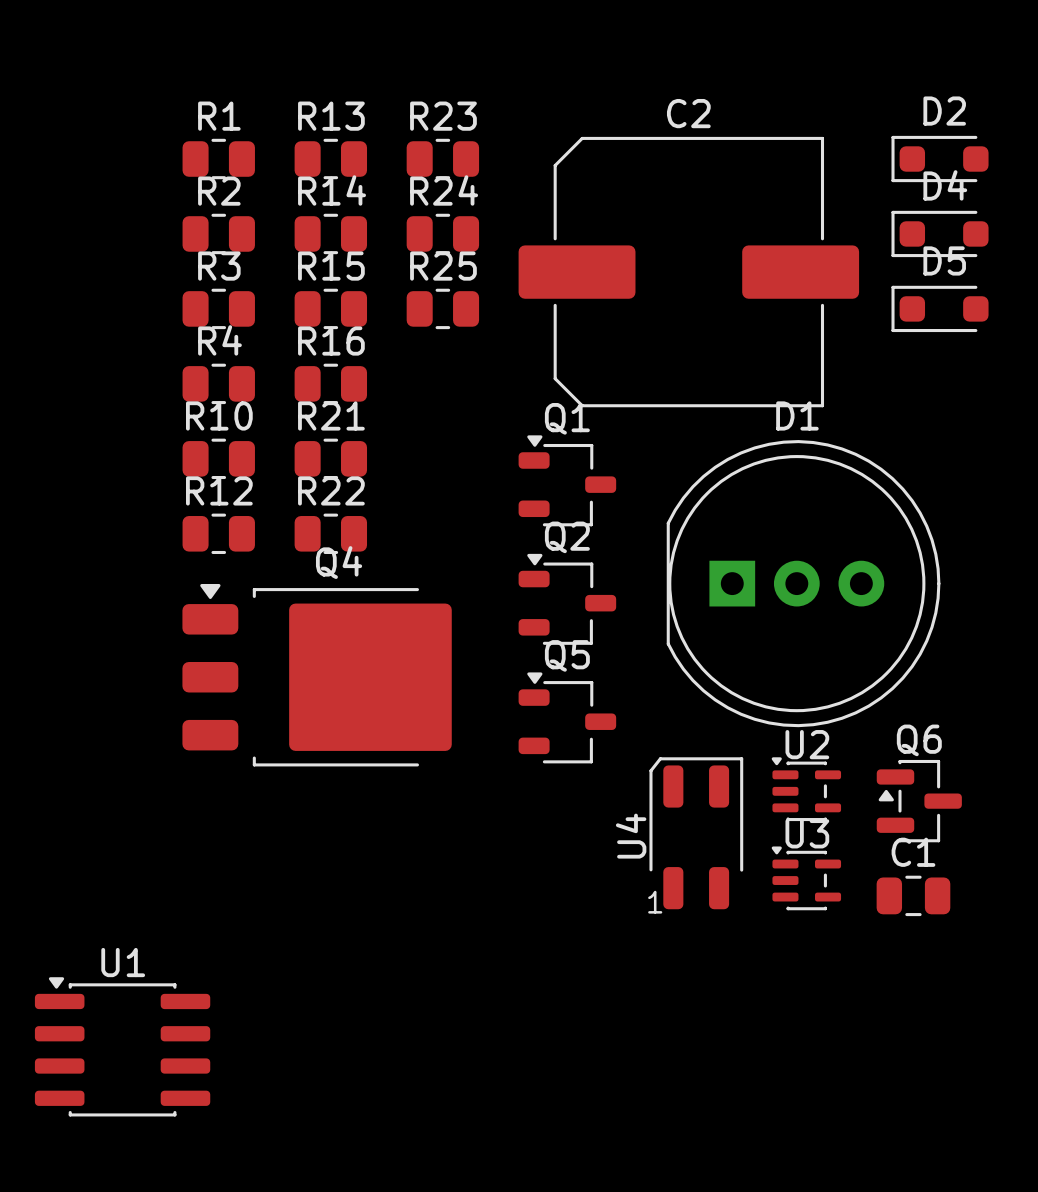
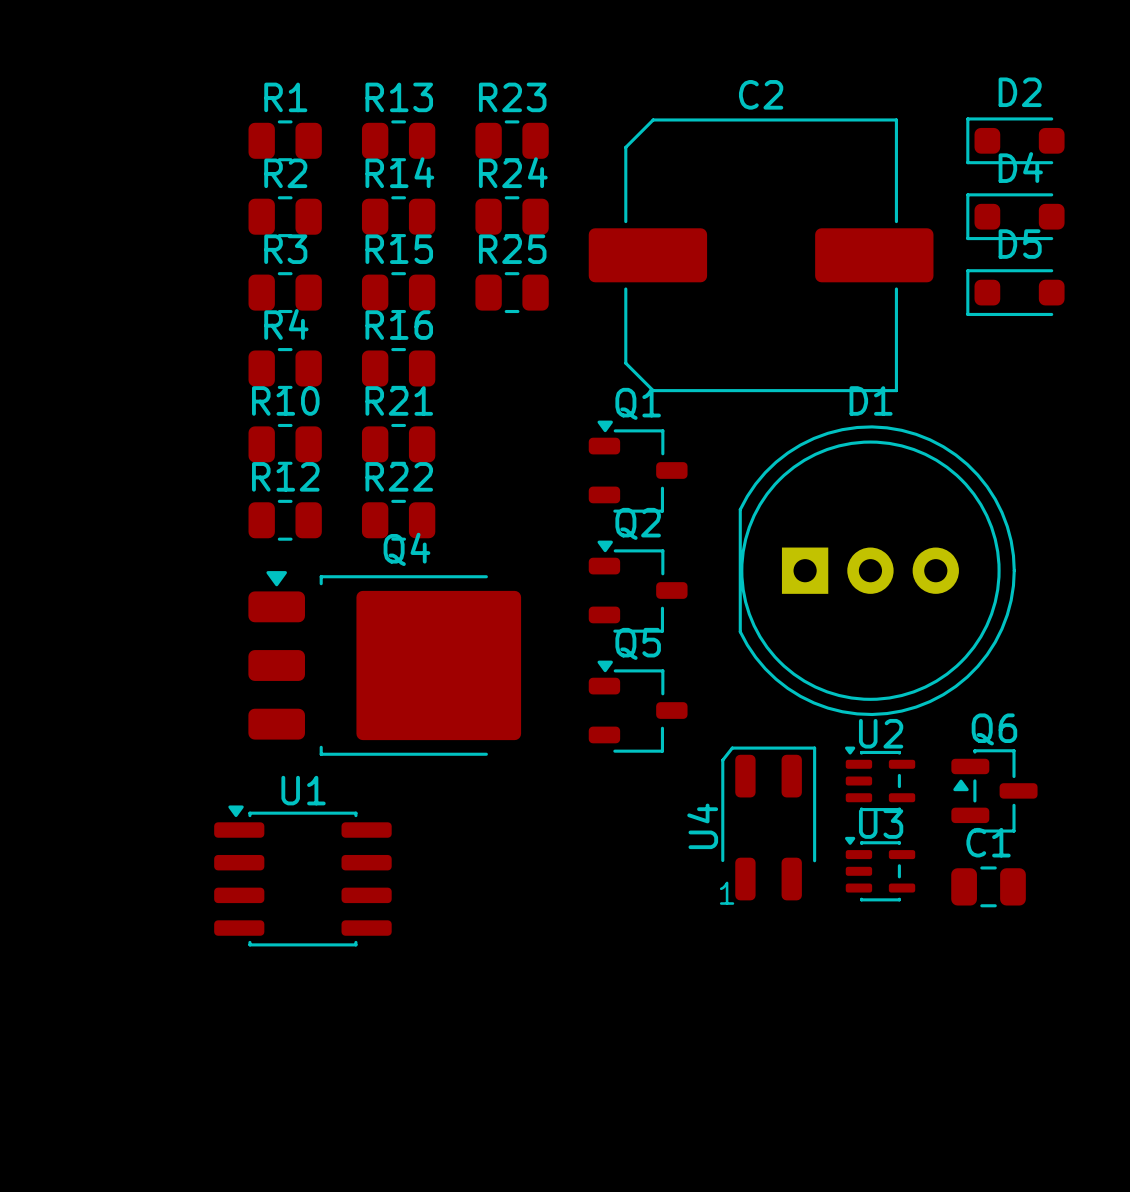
U1 position: (122, 1046) -> (302, 875)

